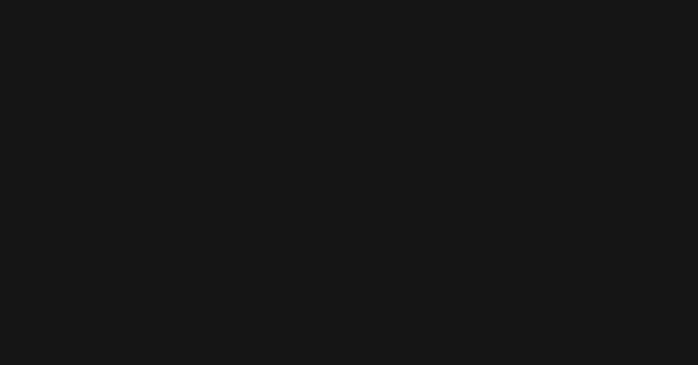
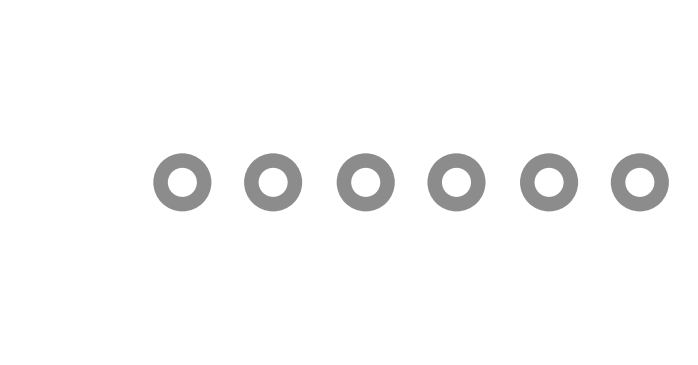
part: none -> (227, 182)
part: none -> (411, 182)
part: none -> (594, 182)

